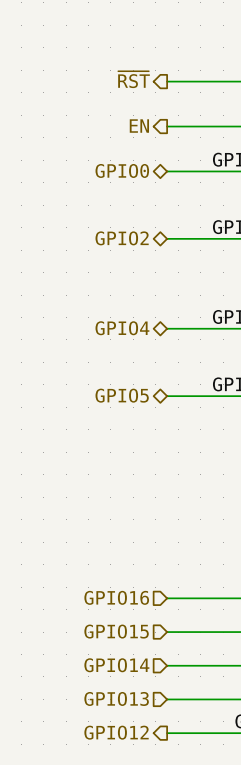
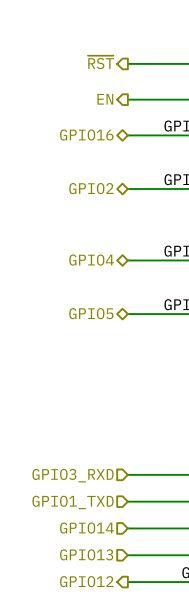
hierarchical label: GPIO0 (122, 170) -> GPIO16 (86, 135)
hierarchical label: GPIO16 (116, 597) -> GPIO3_RXD (73, 475)
hierarchical label: GPIO15 (116, 631) -> GPIO1_TXD (73, 502)

